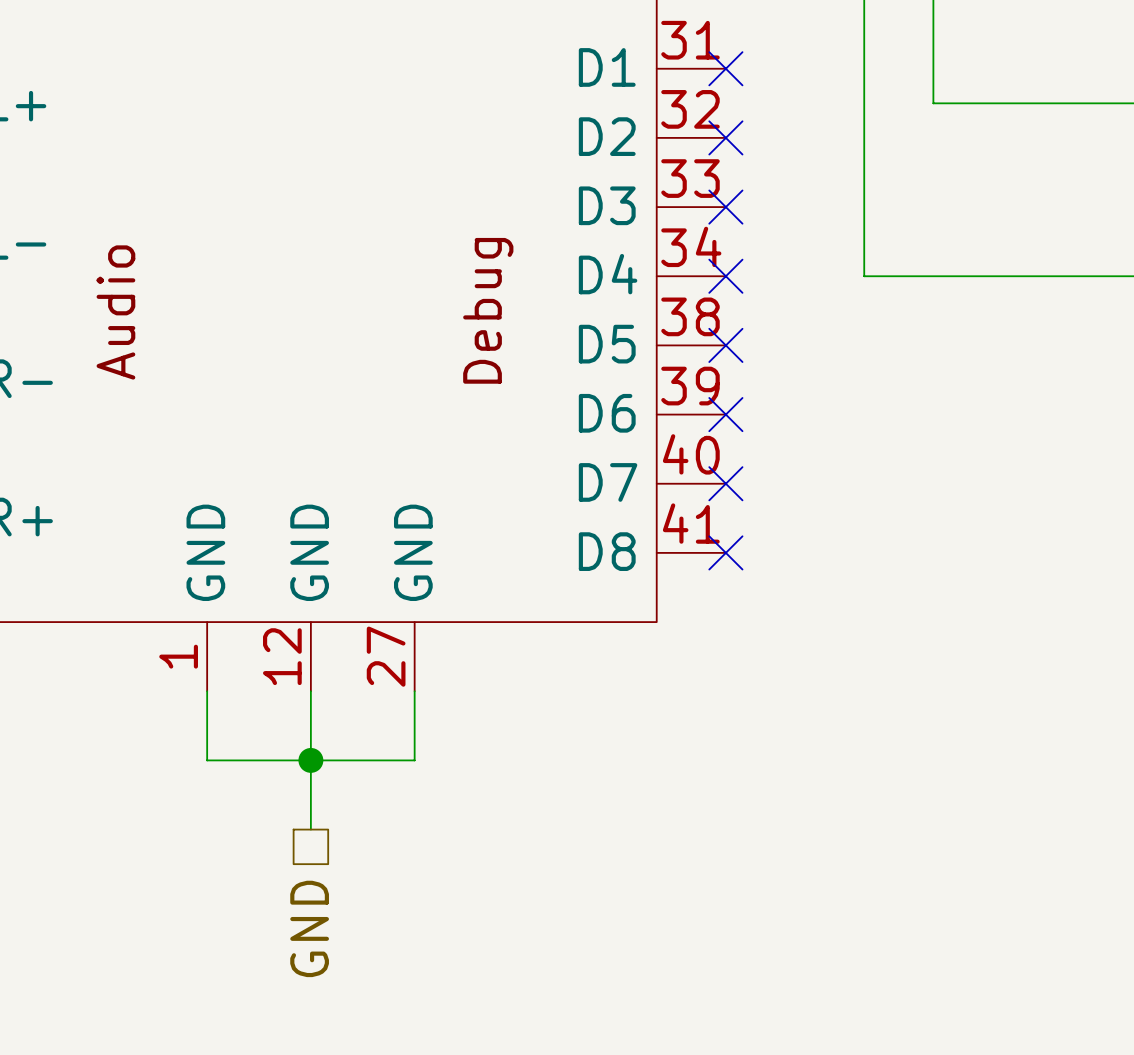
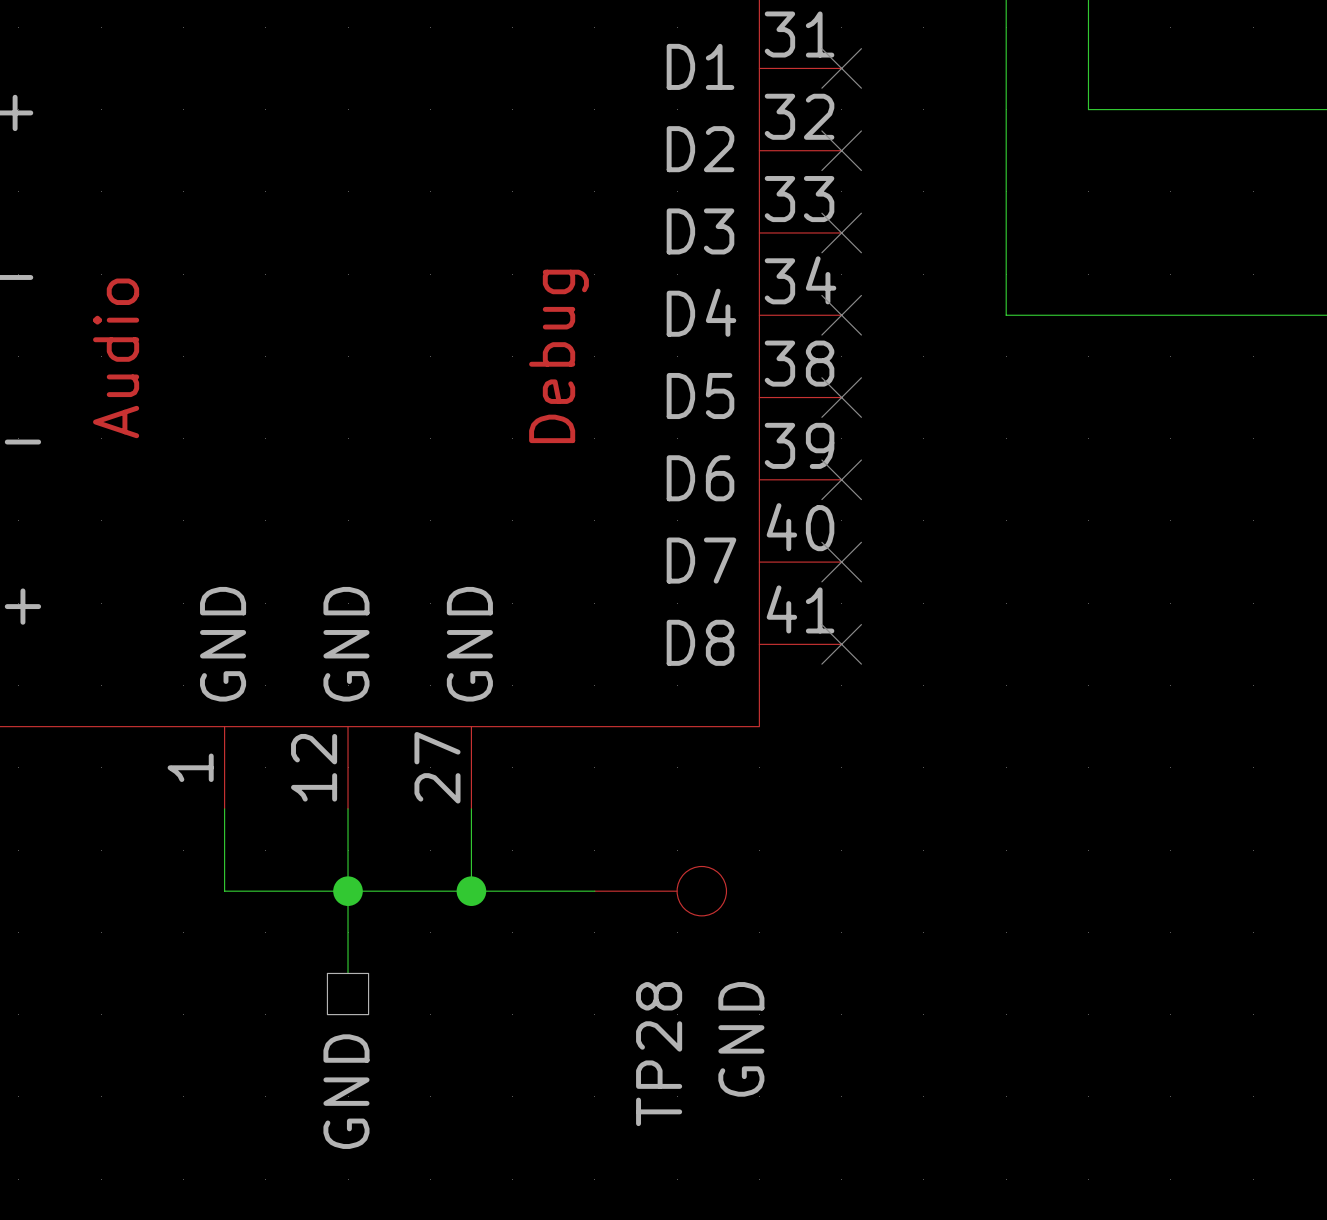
wire: none -> (471, 891) (594, 891)
junction: none -> (471, 891)
TP28: none -> GND (660, 891)

